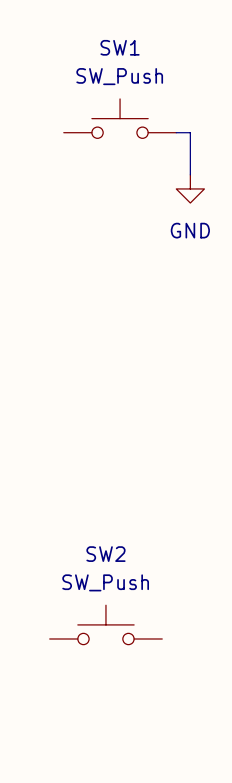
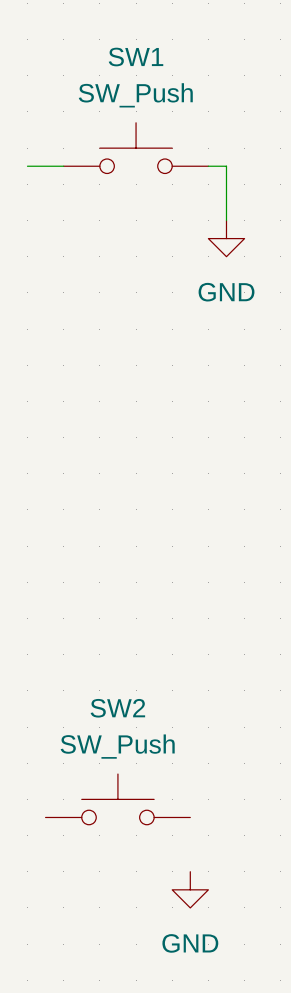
wire: none -> (27, 166) (63, 166)
power symbol: none -> GND (190, 889)

